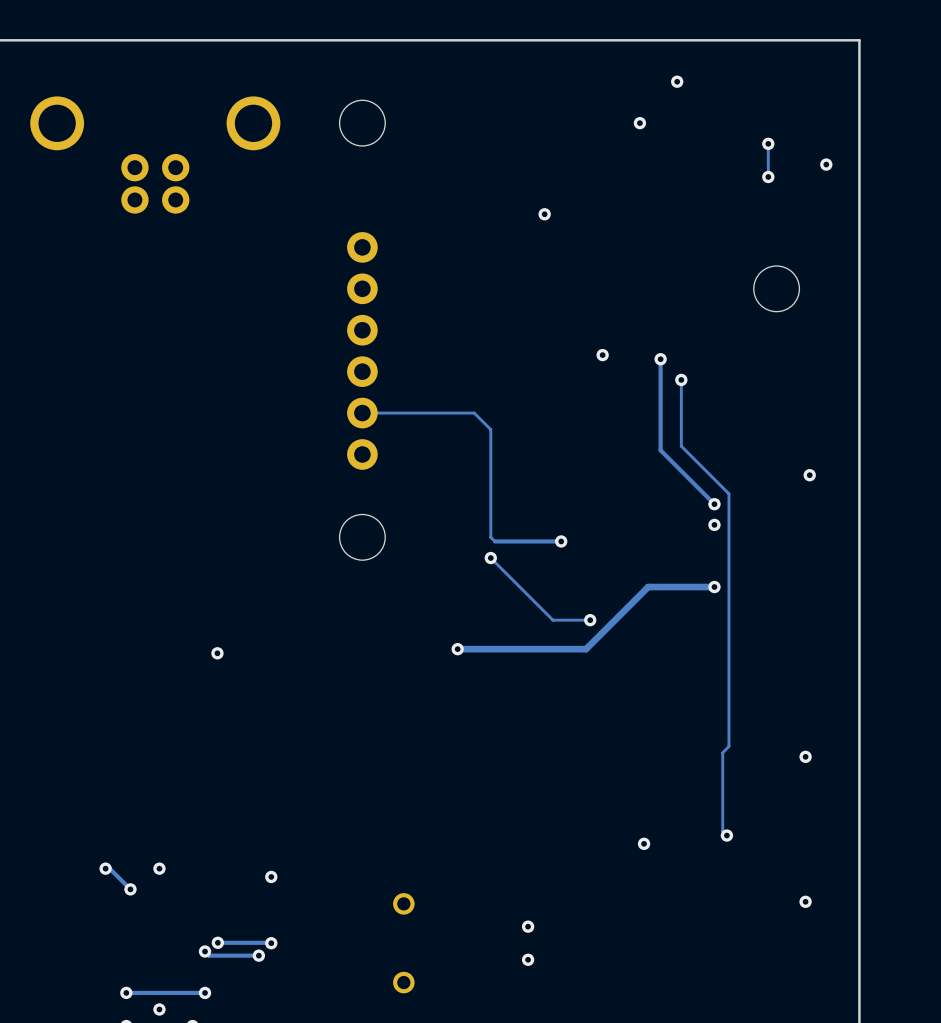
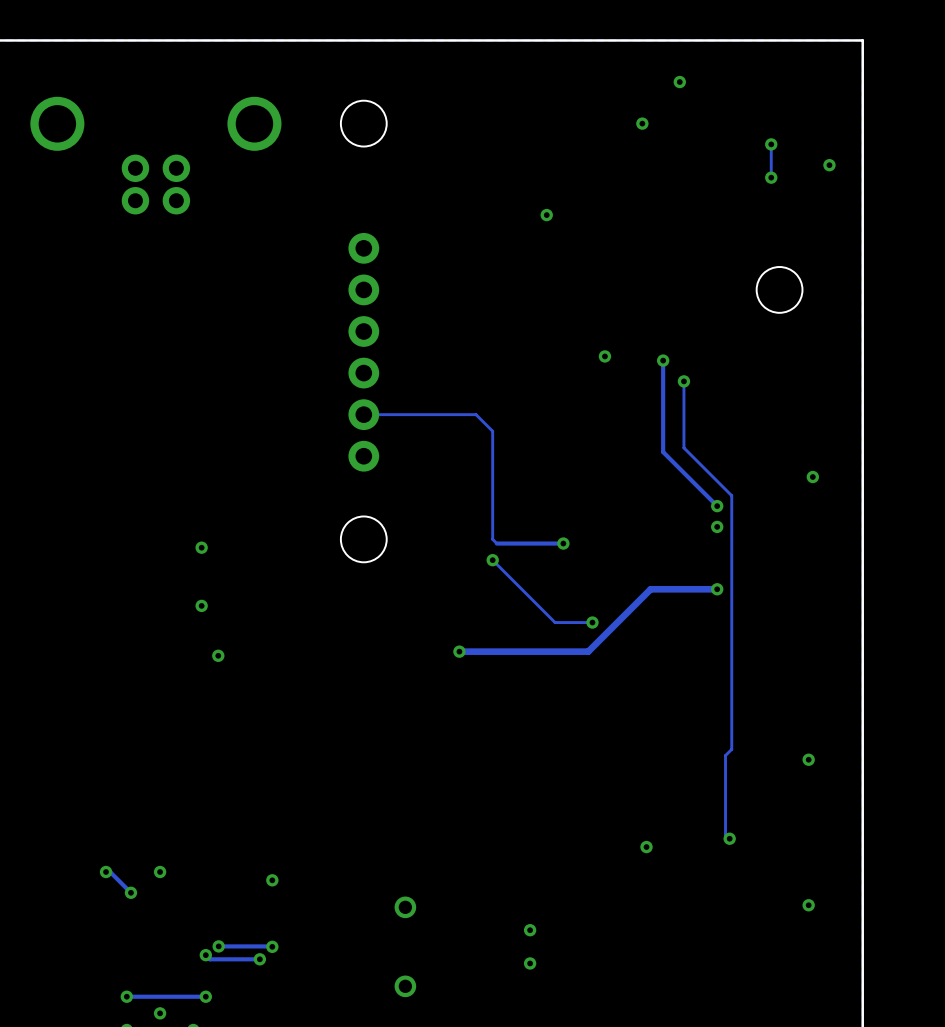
via: none -> (201, 547)
via: none -> (201, 605)

